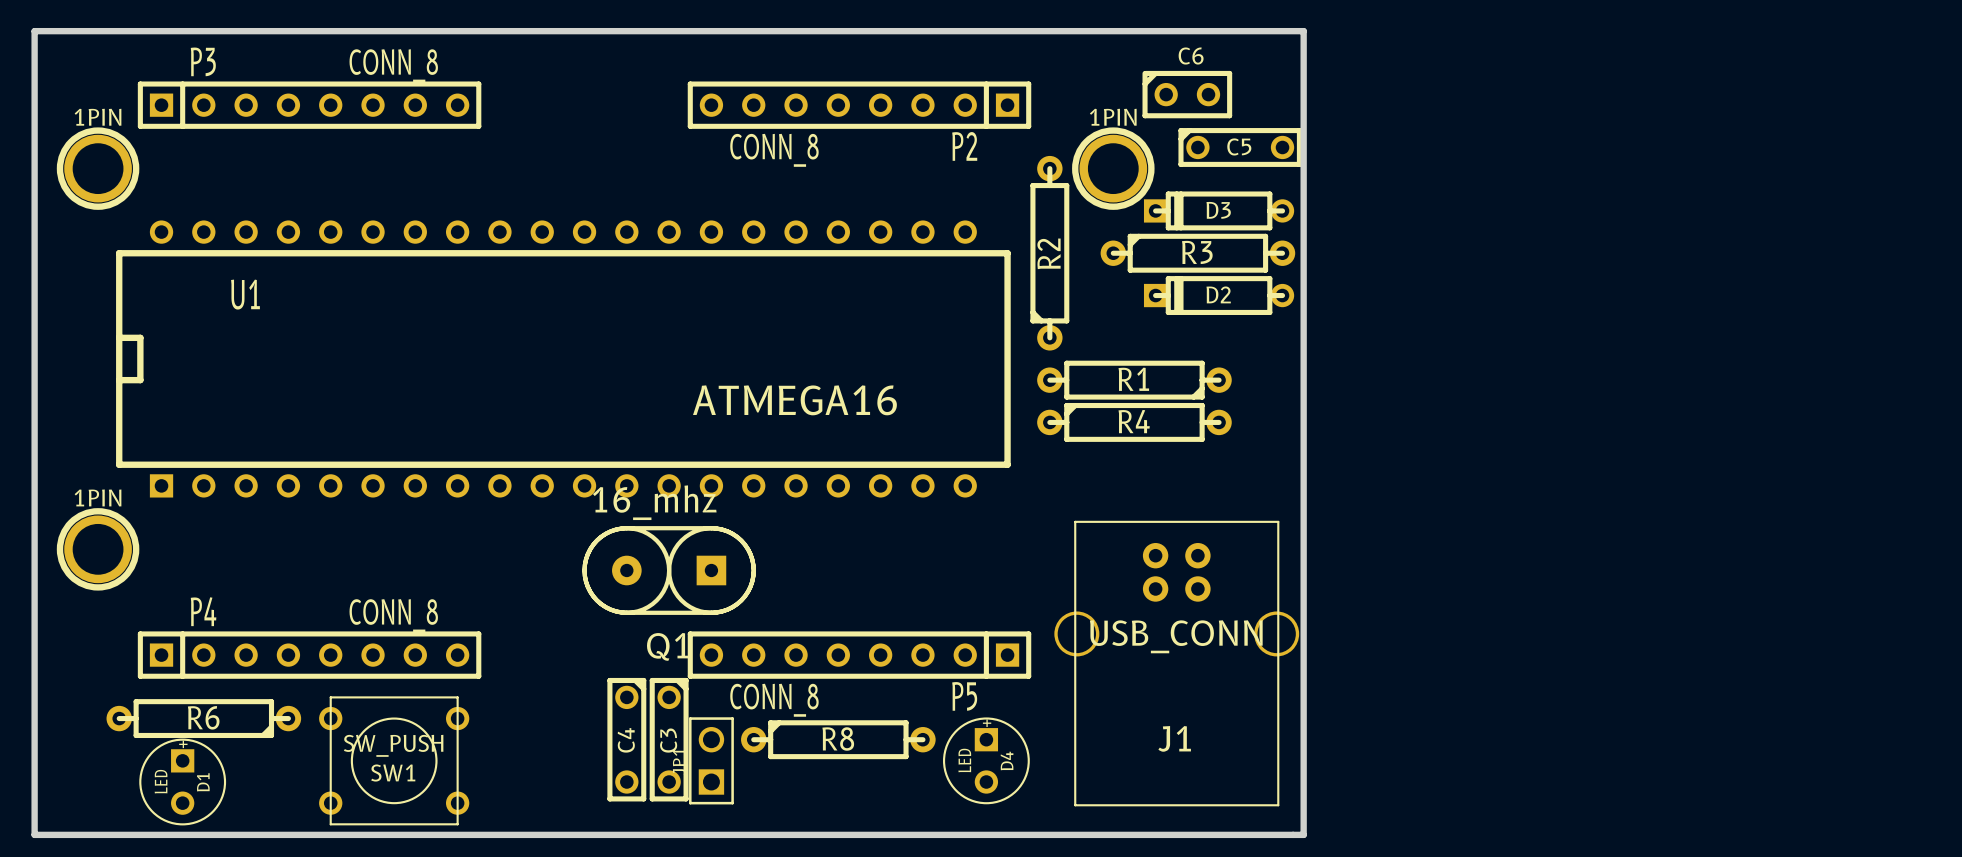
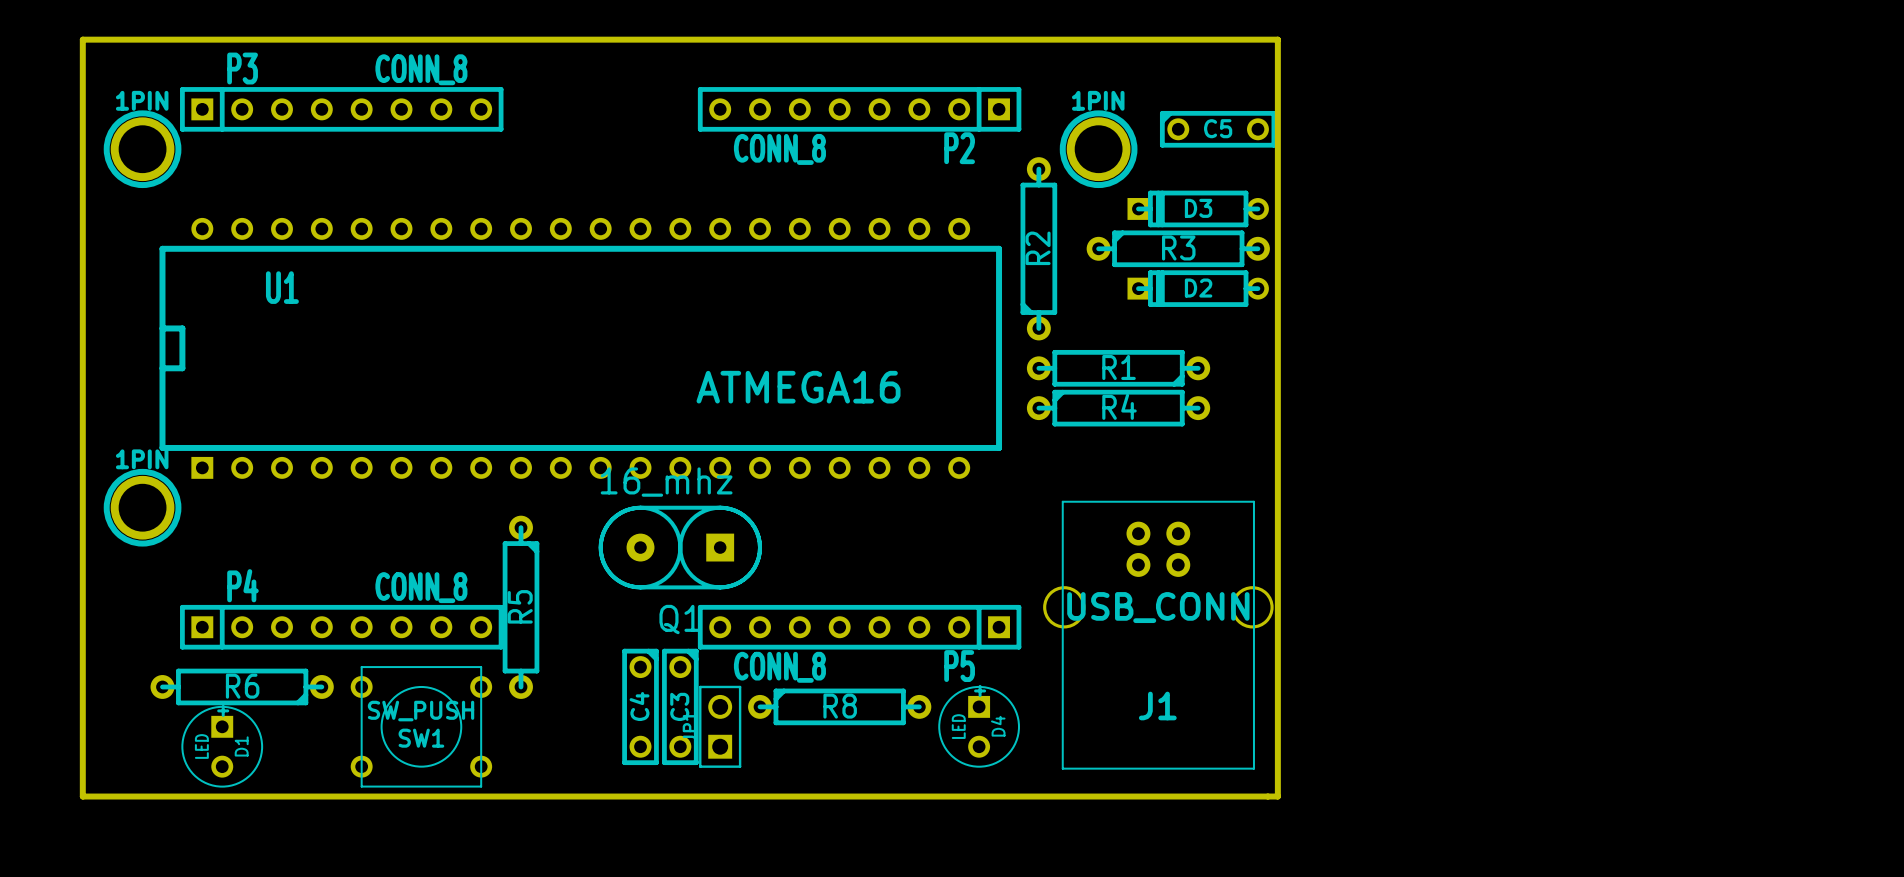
C6: (1187, 94) -> none
C5 position: (1240, 147) -> (1218, 129)
1PIN position: (98, 168) -> (142, 149)
1PIN position: (1113, 168) -> (1098, 149)
1PIN position: (98, 549) -> (142, 507)
R5: none -> (521, 607)

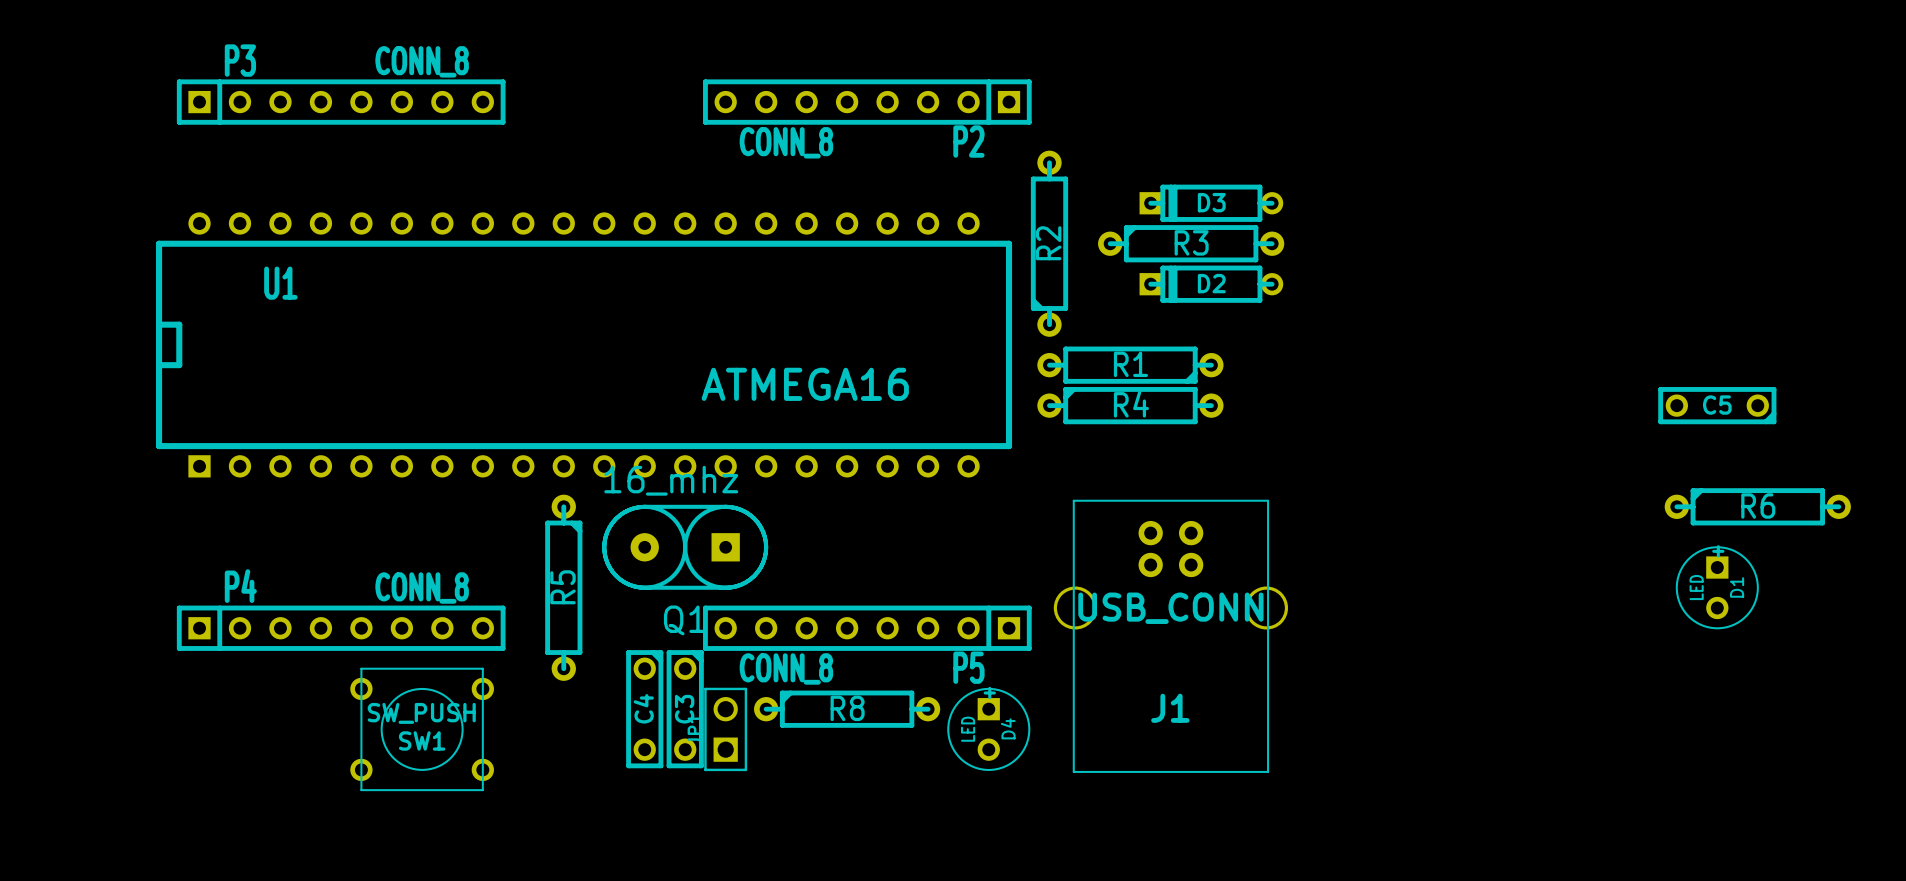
board edge: (82, 39) (82, 796) (1277, 796) (1277, 39) (82, 39) -> none
C5 rotation: 0° (1218, 129) -> 180° (1717, 405)
C5 position: (1218, 129) -> (1717, 405)
1PIN: (142, 149) -> none
1PIN: (1098, 149) -> none
1PIN: (142, 507) -> none
R5 position: (521, 607) -> (563, 587)
R6 rotation: 0° (242, 686) -> 180° (1757, 506)
R6 position: (242, 686) -> (1757, 506)
D1 position: (222, 746) -> (1717, 587)

